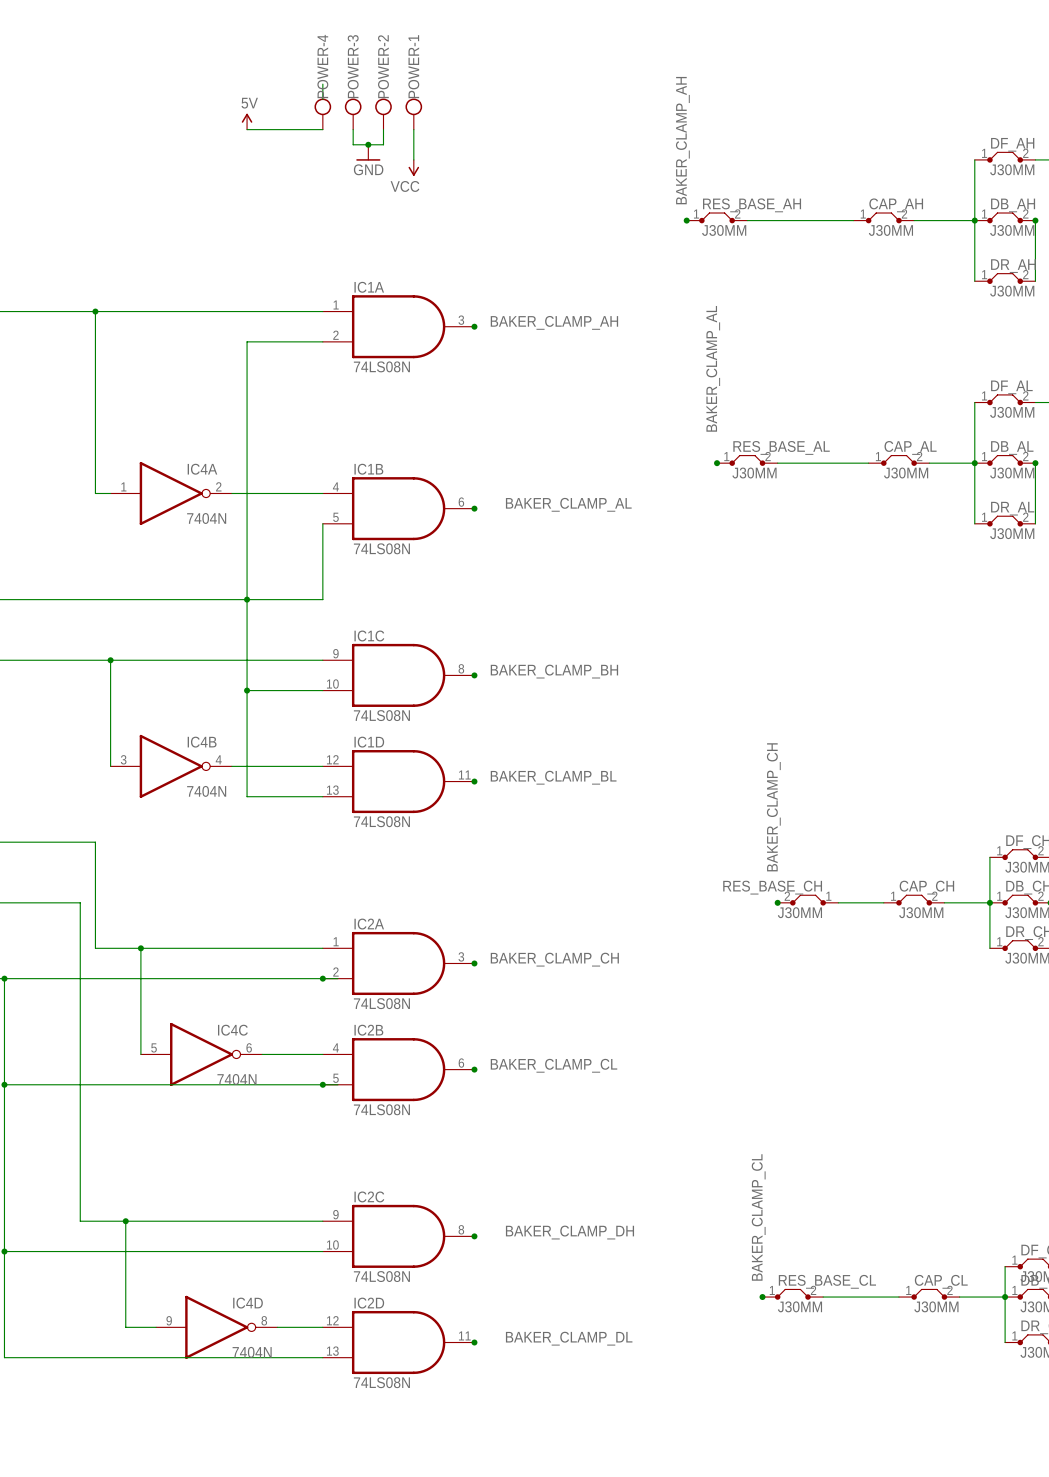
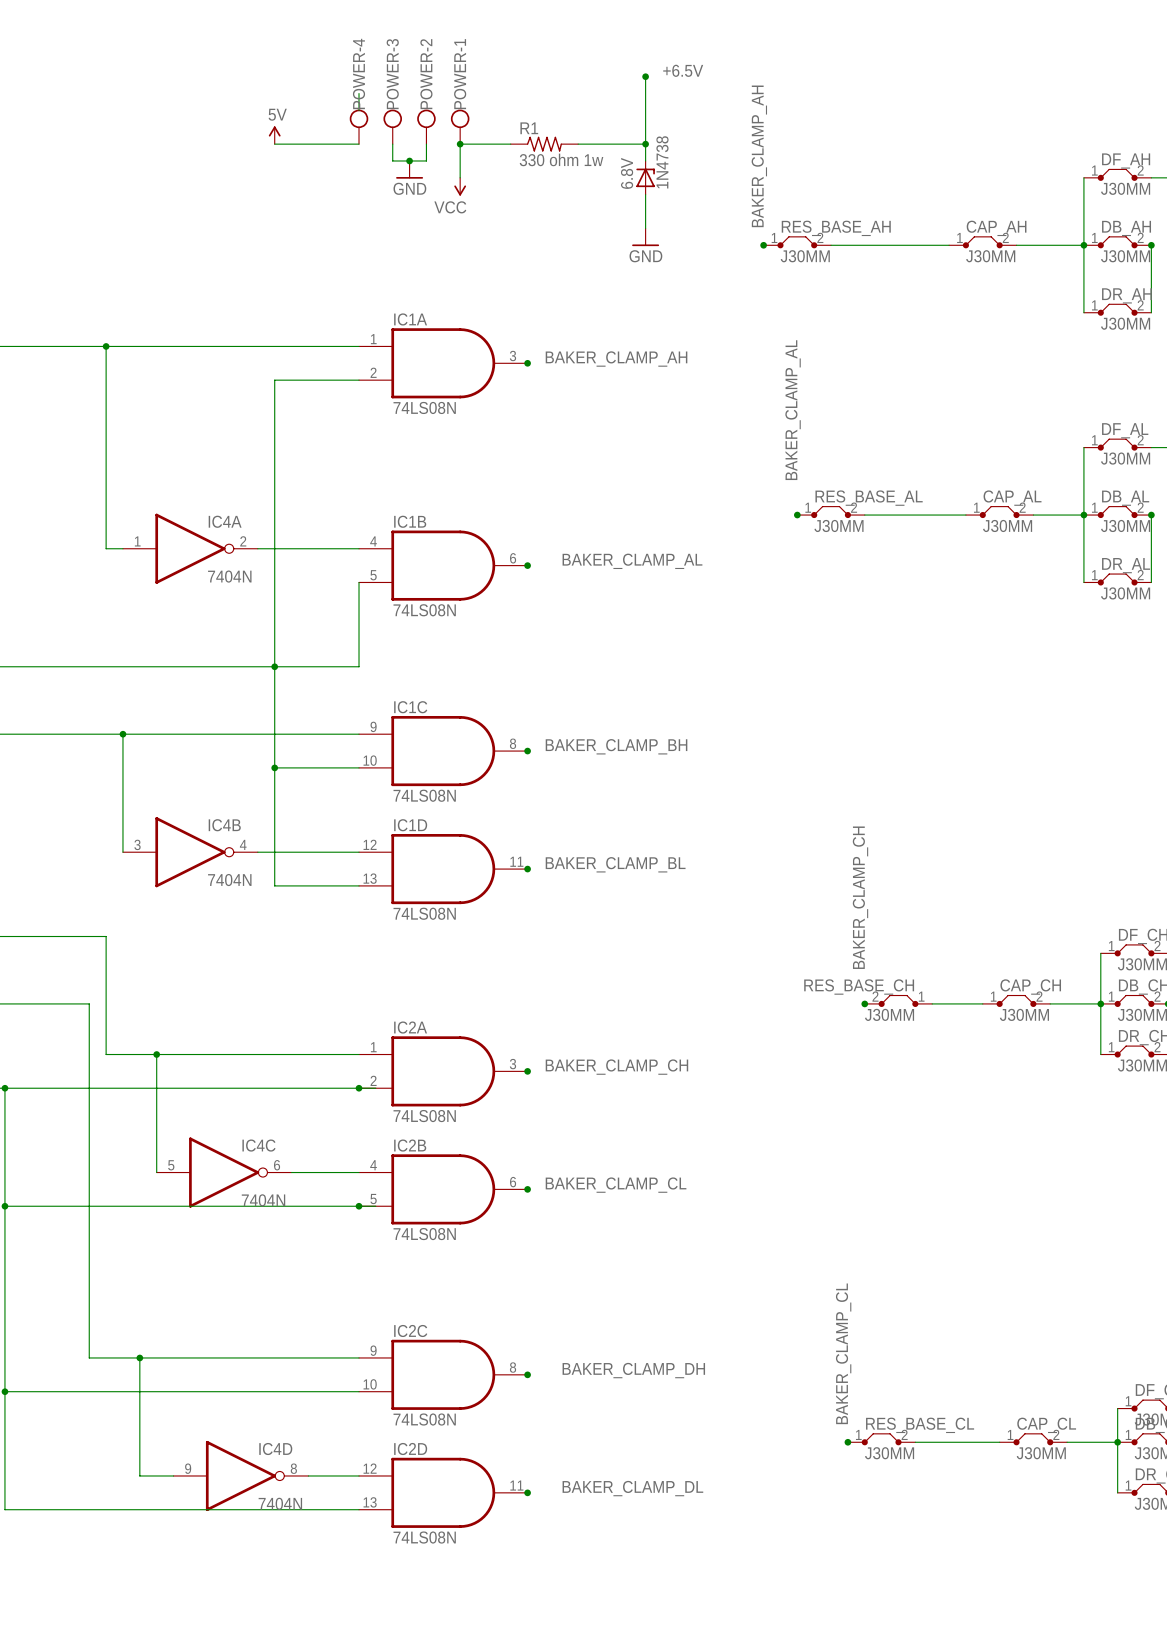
label: none -> +6.5V (683, 70)
wire: none -> (645, 76) (645, 160)
junction: none -> (645, 76)
wire: none -> (460, 144) (510, 144)
junction: none -> (460, 144)
R1: none -> 330 ohm 1w (544, 144)
wire: none -> (578, 144) (645, 144)
junction: none -> (645, 144)
6.8V: none -> 1N4738 (645, 177)
wire: none -> (645, 194) (645, 228)
power symbol: none -> GND (645, 237)

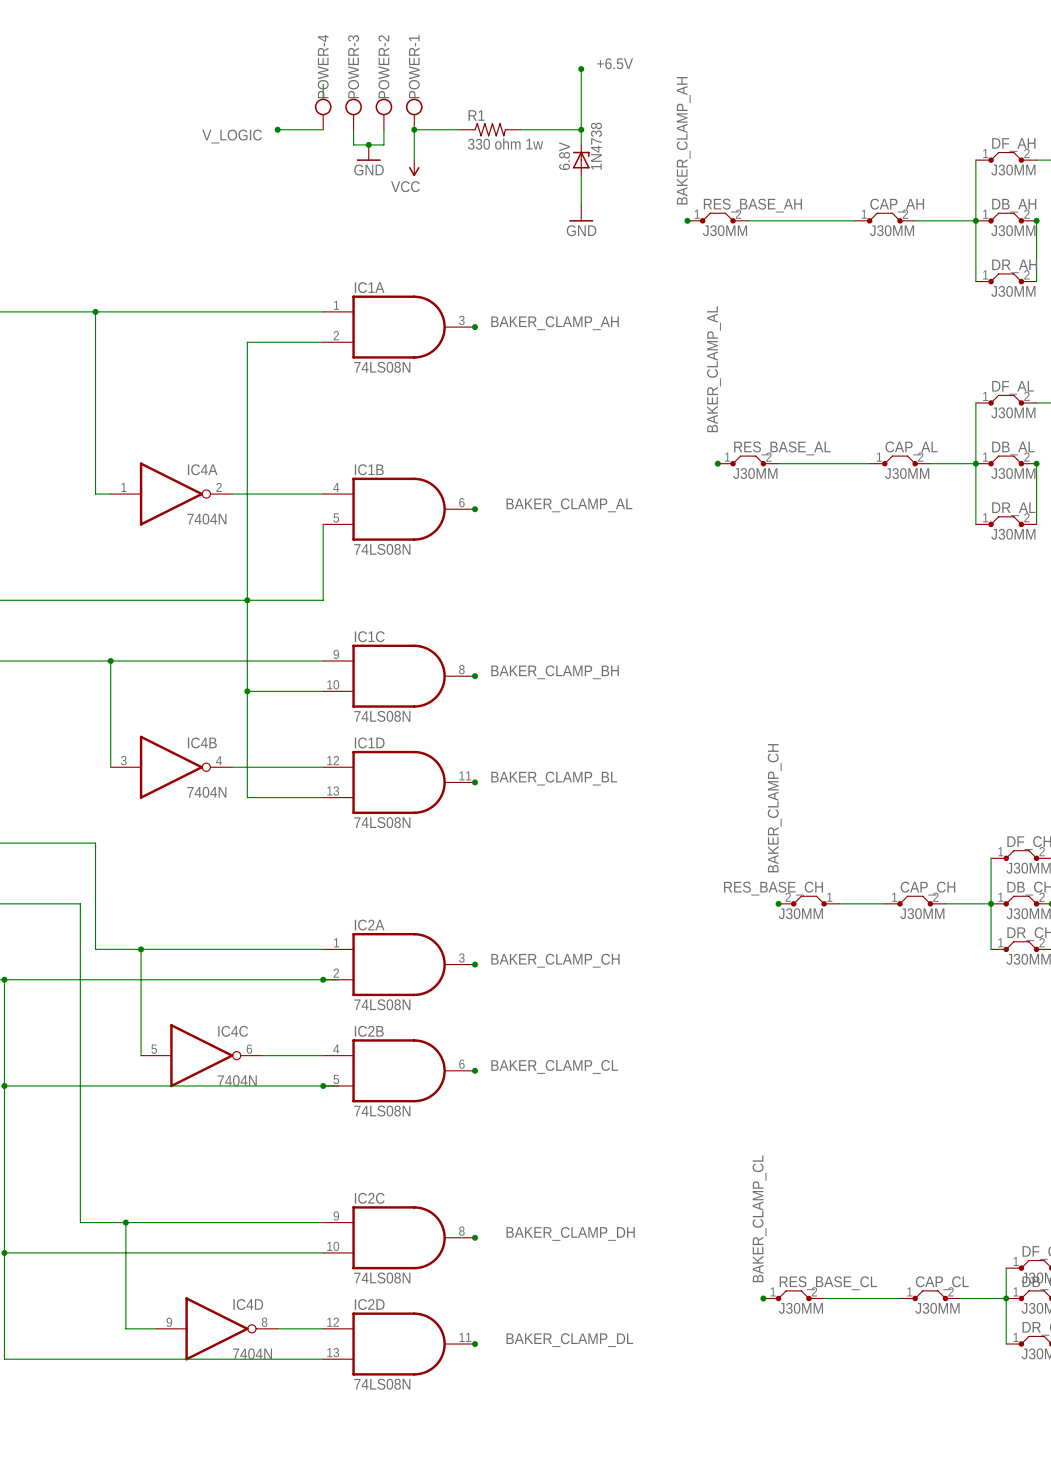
power symbol: 5V (274, 135) -> none
wire: (274, 144) (308, 144) -> none
junction: none -> (277, 129)
label: none -> V_LOGIC (232, 136)

